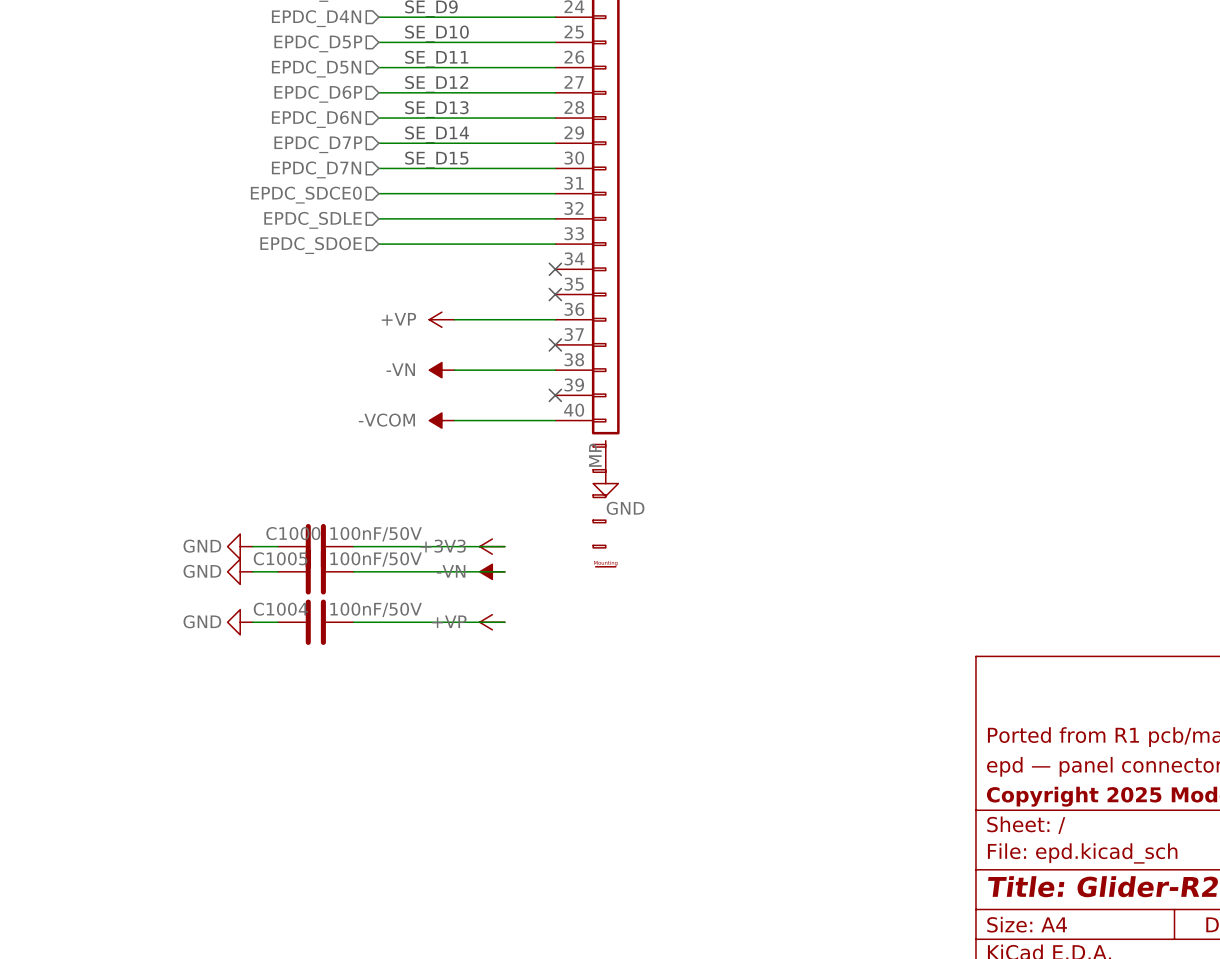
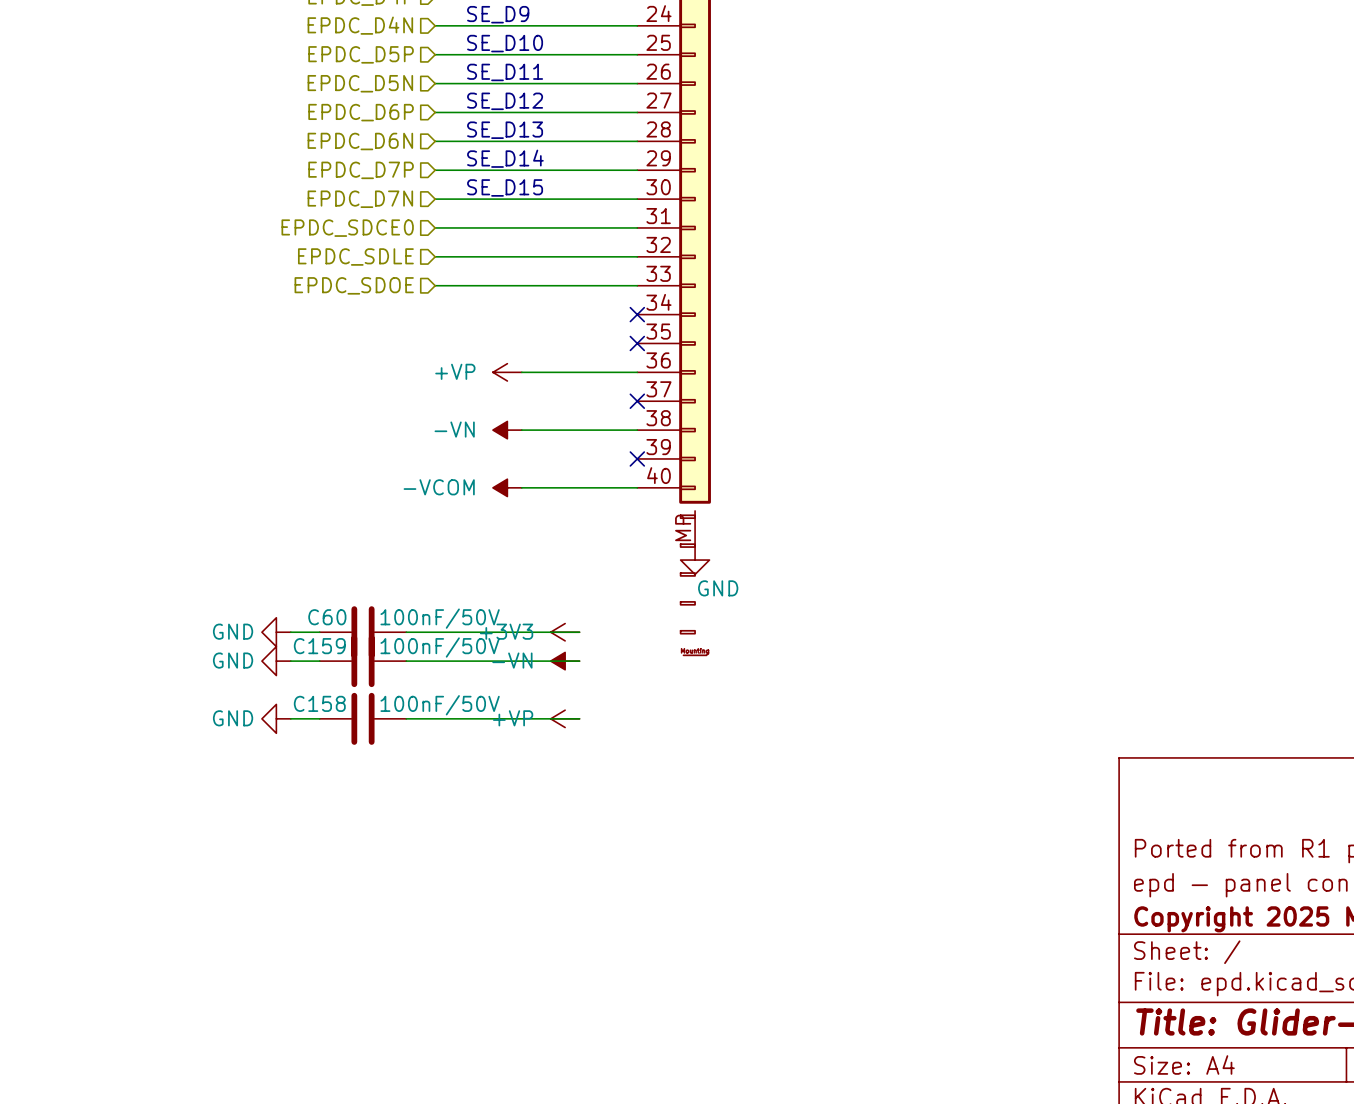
C1000 name: C1000 (293, 533) -> C60 (327, 617)
C1005 name: C1005 (280, 558) -> C159 (319, 646)
C1004 name: C1004 (280, 609) -> C158 (319, 703)

